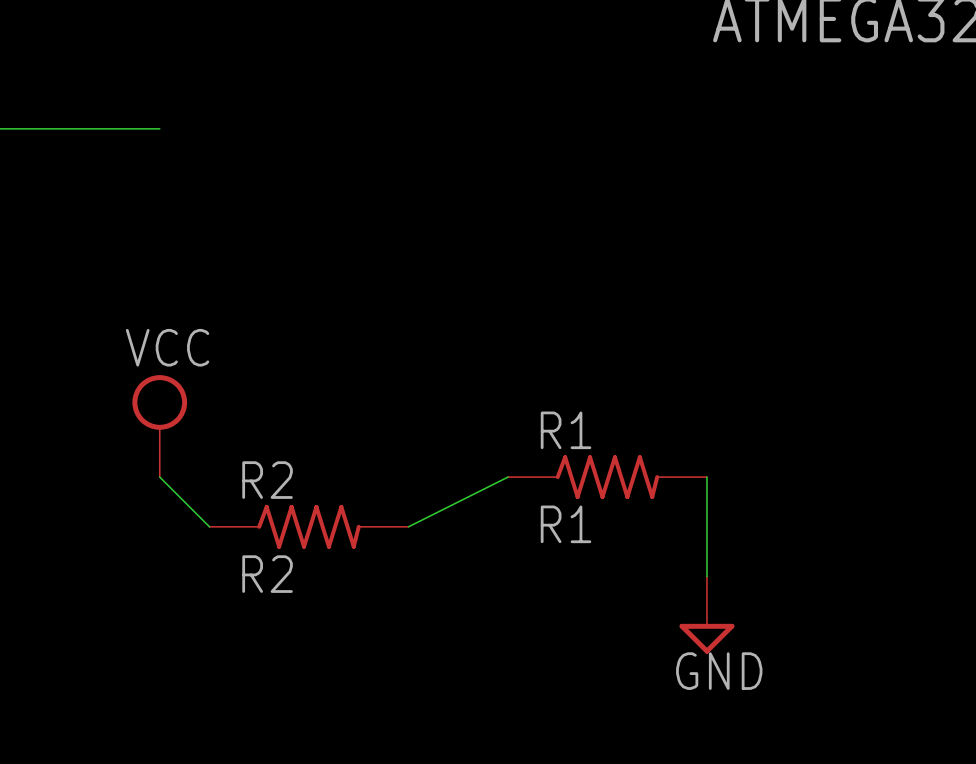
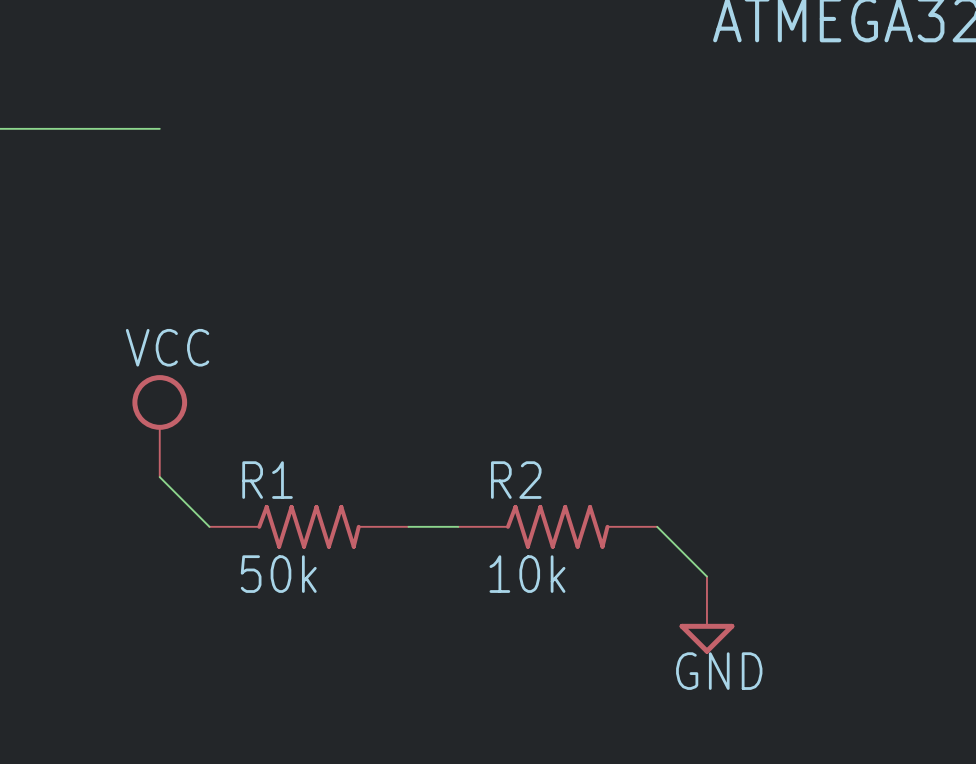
wire: (507, 477) (408, 526) -> (458, 526) (408, 526)
R1: R1 (607, 477) -> none
wire: (706, 477) (706, 576) -> (657, 526) (706, 576)
R2 name: R2 (267, 480) -> R1 (267, 480)
R2: none -> 10k (557, 526)
R2 value: R2 (267, 574) -> 50k (278, 574)

